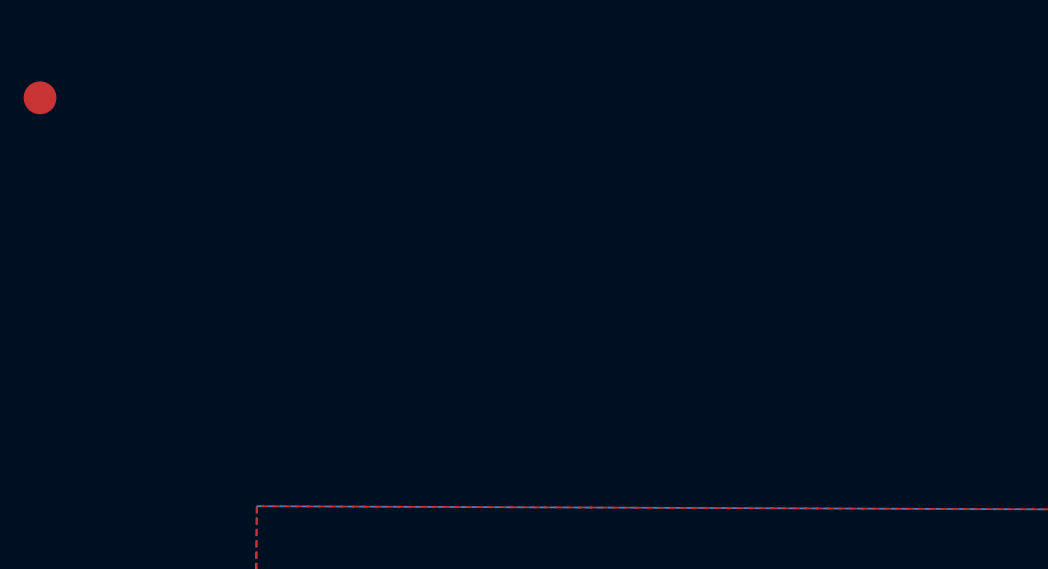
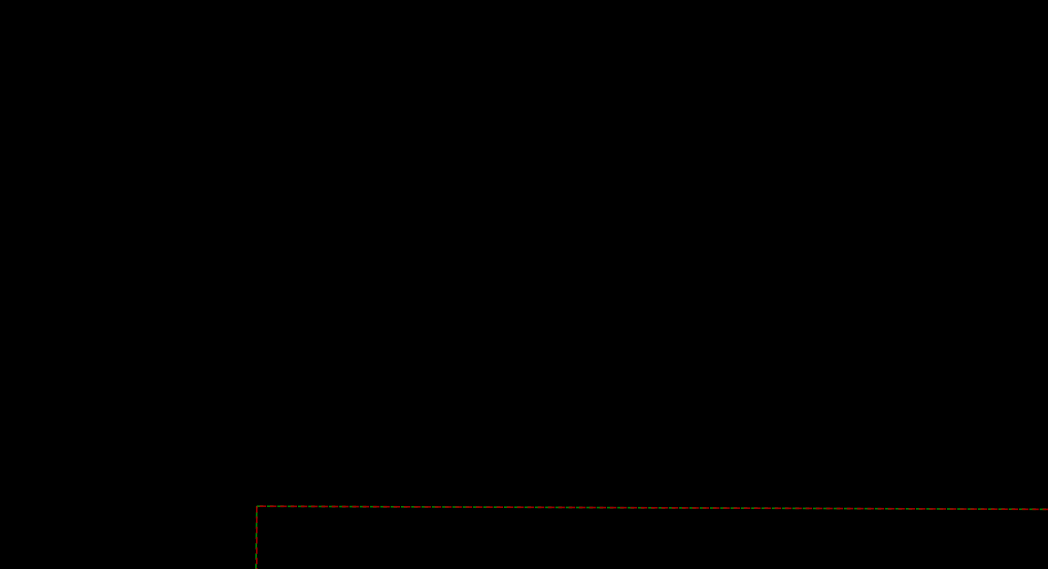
part: (40, 97) -> none

